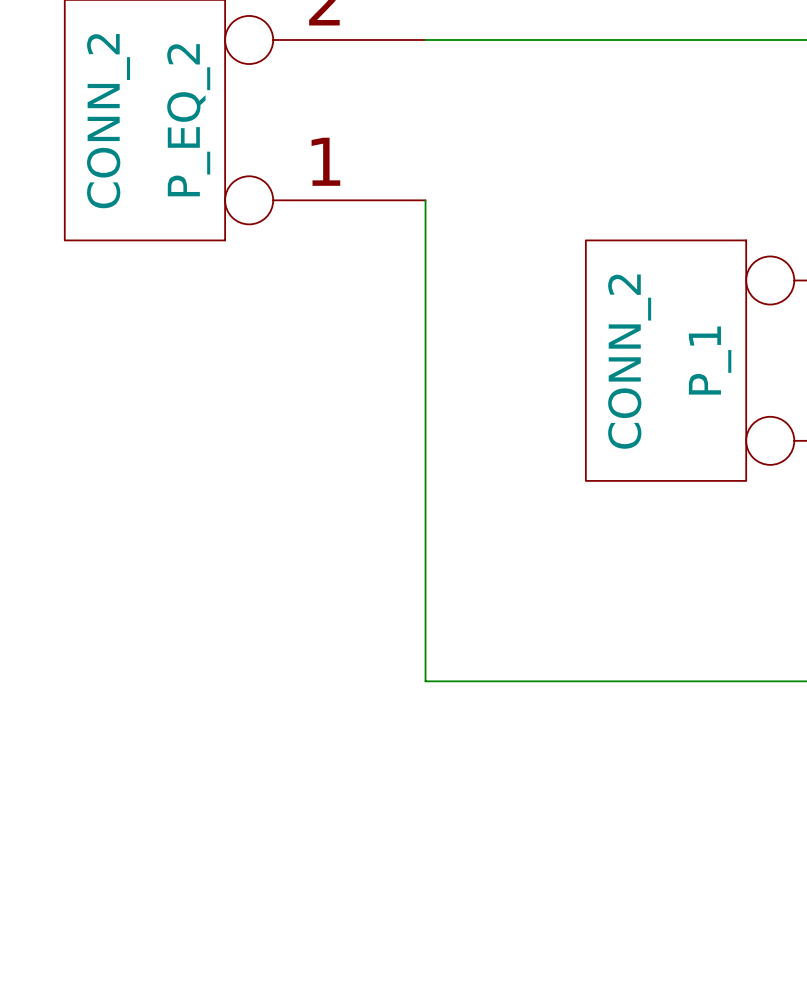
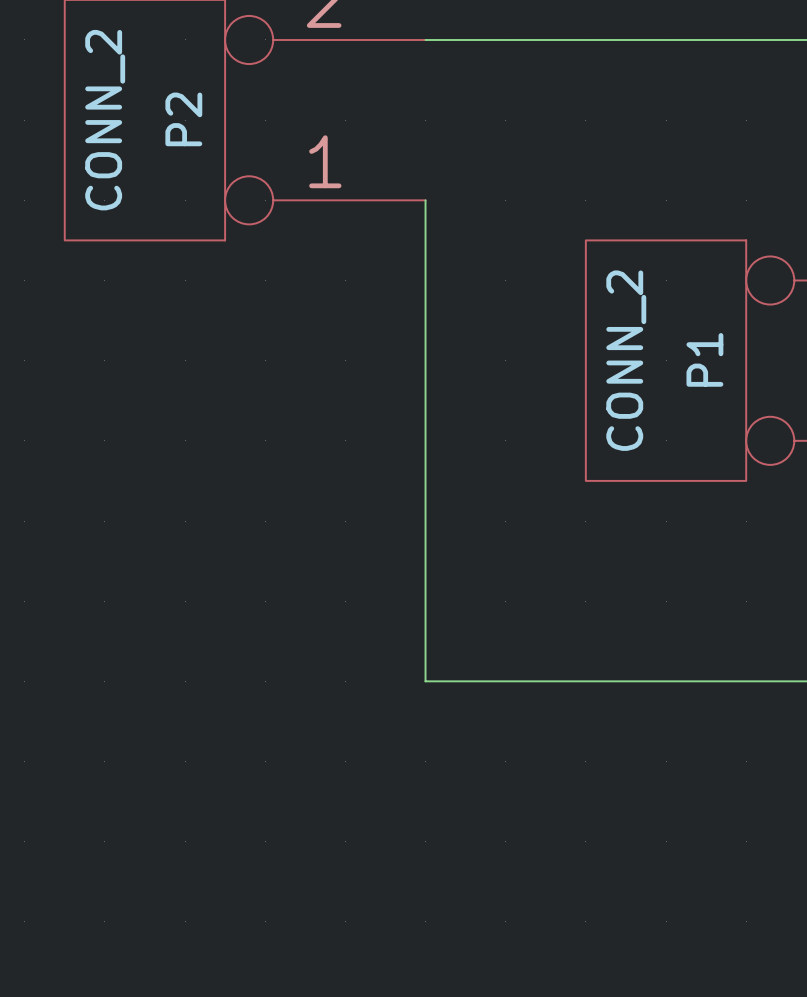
P_EQ_2 name: P_EQ_2 (188, 120) -> P2 (183, 119)
P_1 name: P_1 (710, 360) -> P1 (704, 359)

